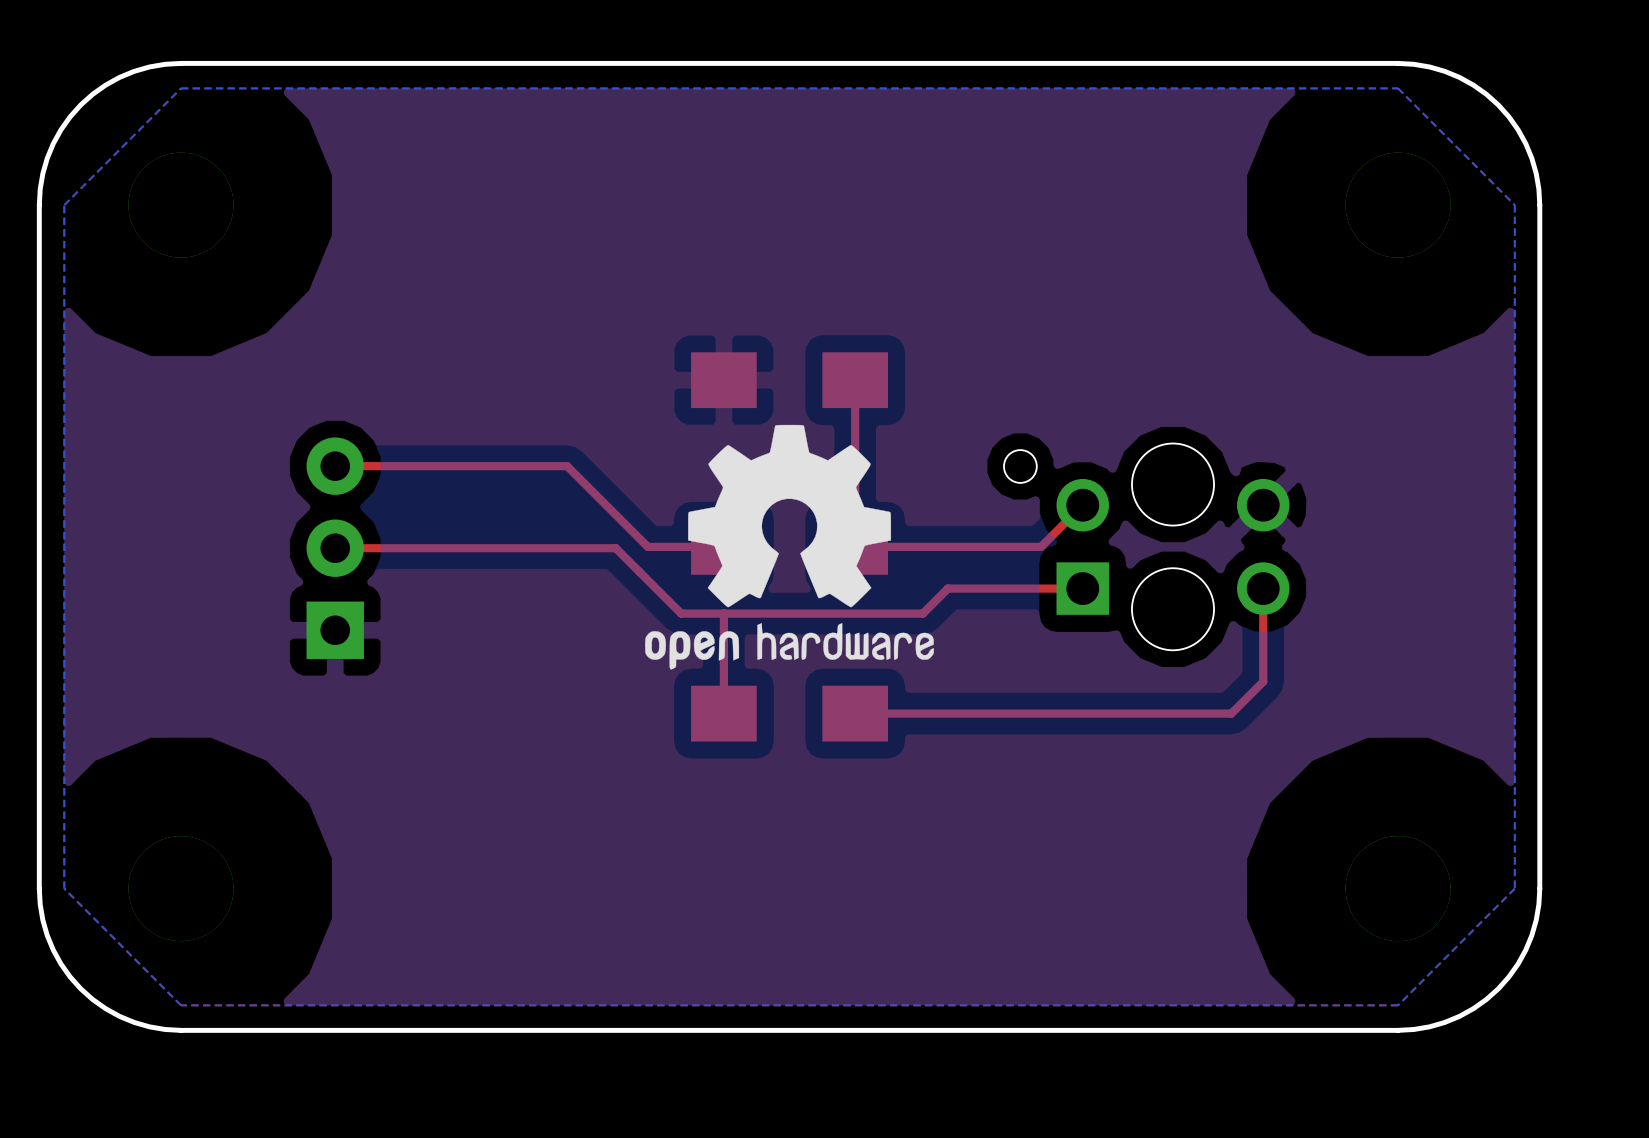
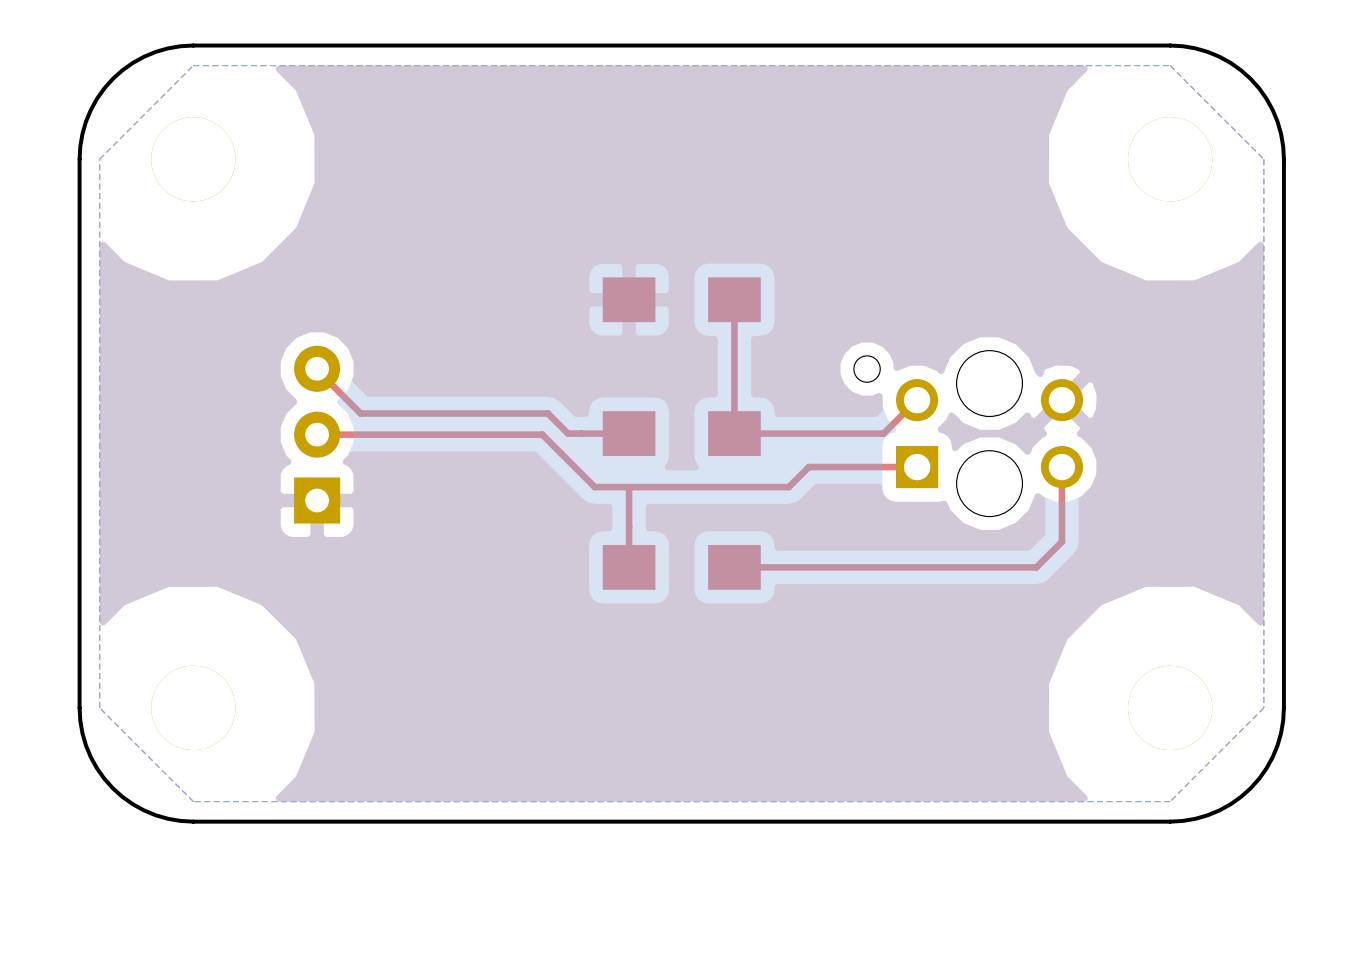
drawing: [645, 424, 934, 670] -> none
top track: (335, 466) (567, 466) (622, 521) -> (317, 368) (360, 413) (547, 413)

